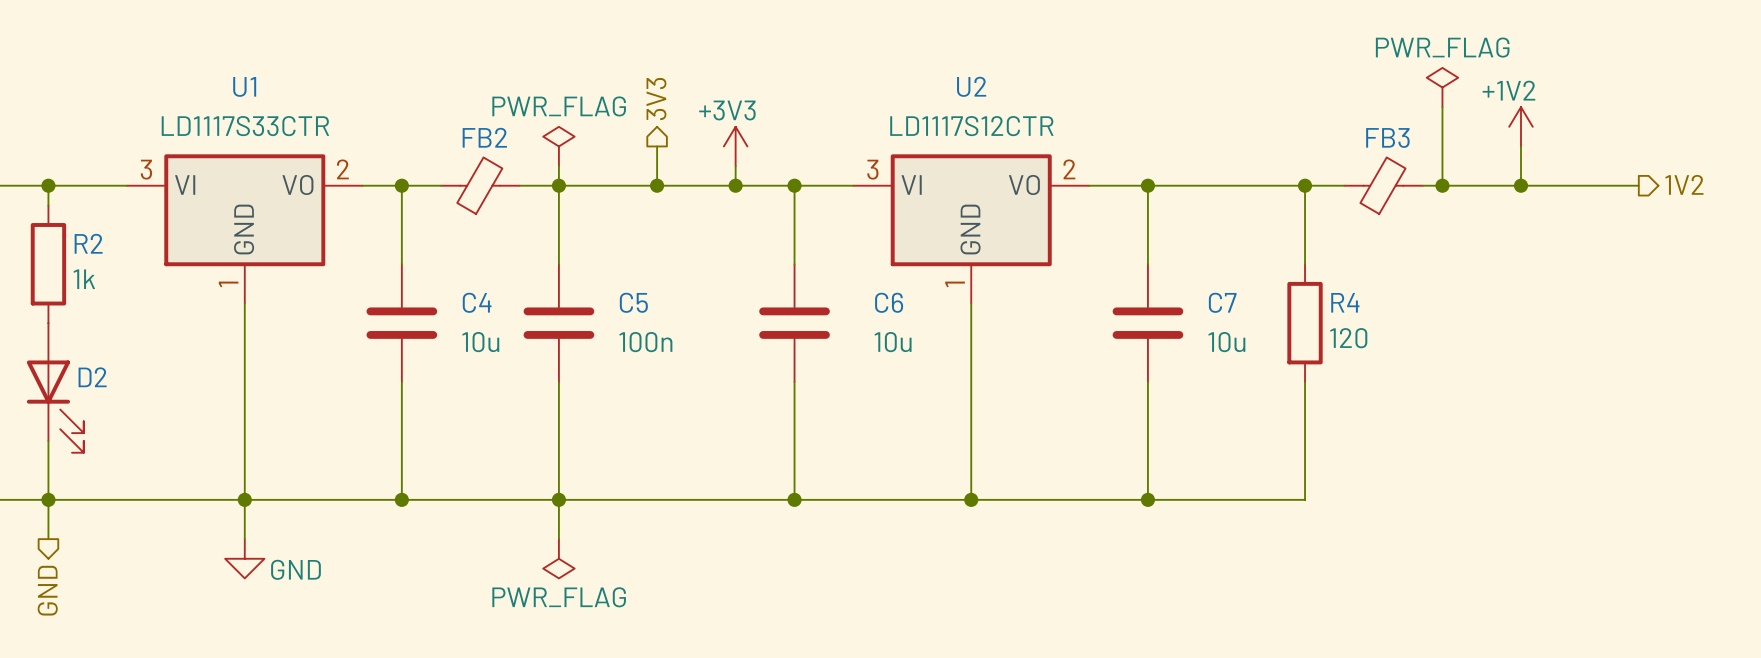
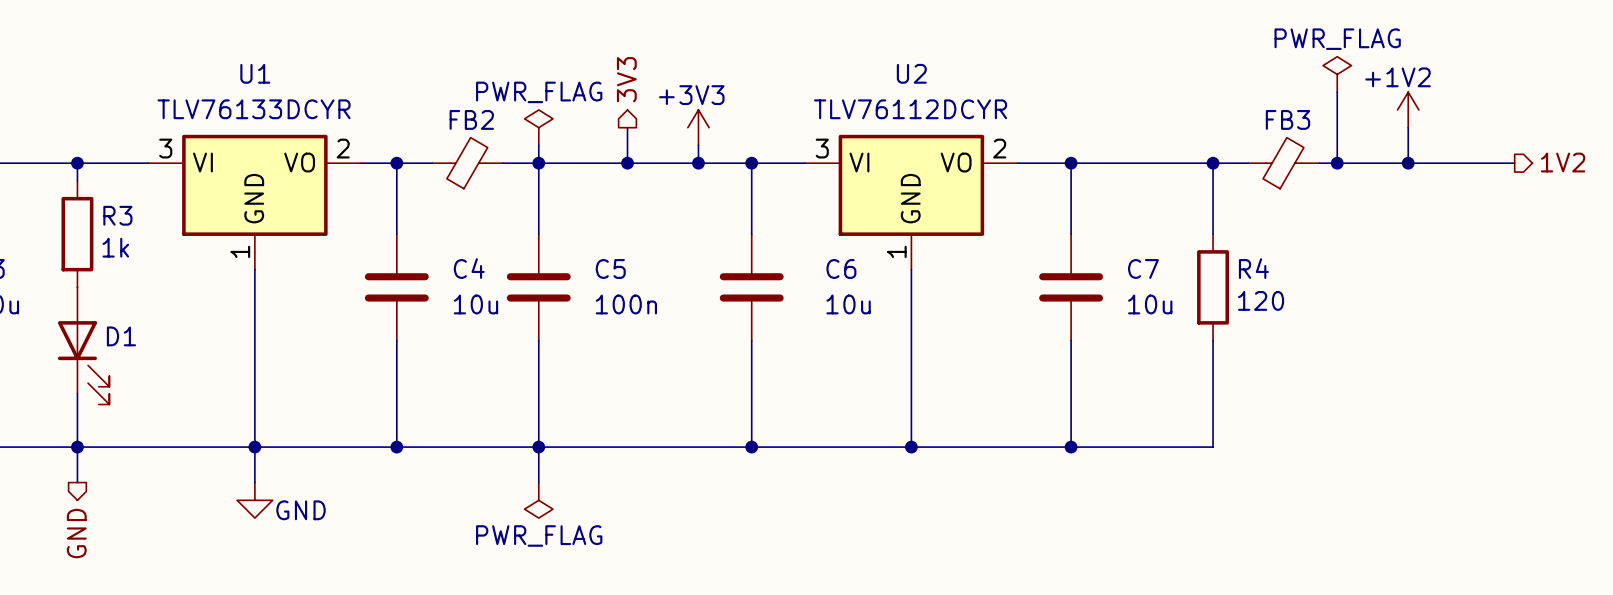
U1 value: LD1117S33CTR (245, 126) -> TLV76133DCYR (254, 109)
U2 value: LD1117S12CTR (971, 126) -> TLV76112DCYR (910, 109)
R2 name: R2 (88, 243) -> R3 (117, 215)
D2 name: D2 (92, 377) -> D1 (121, 336)

